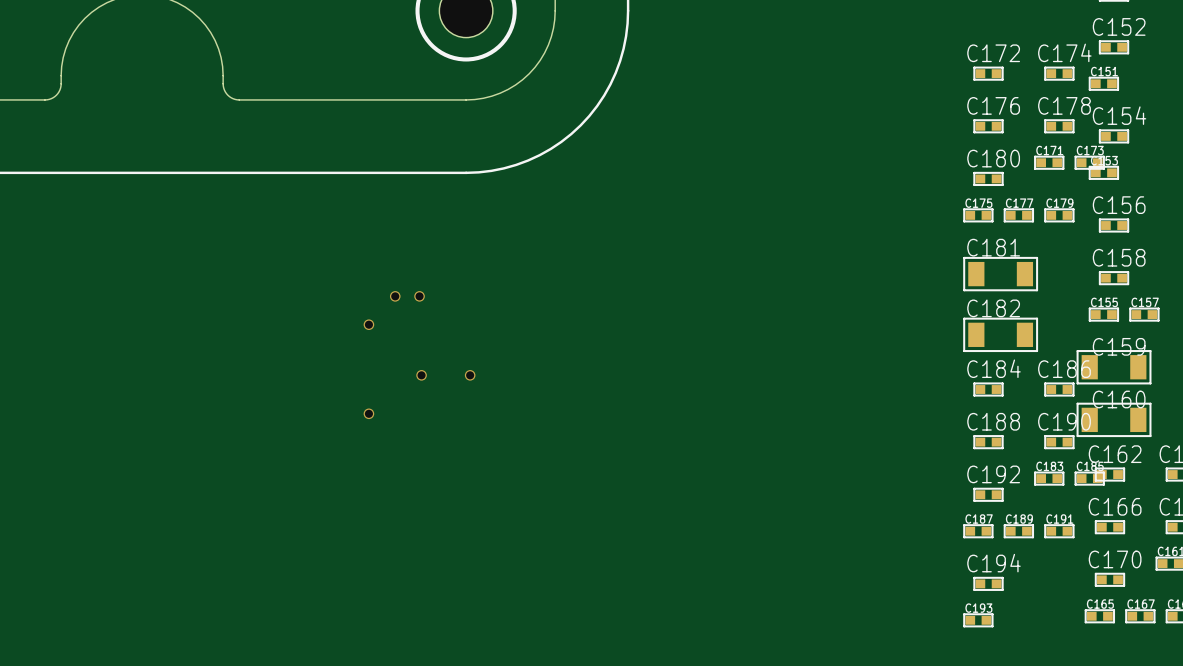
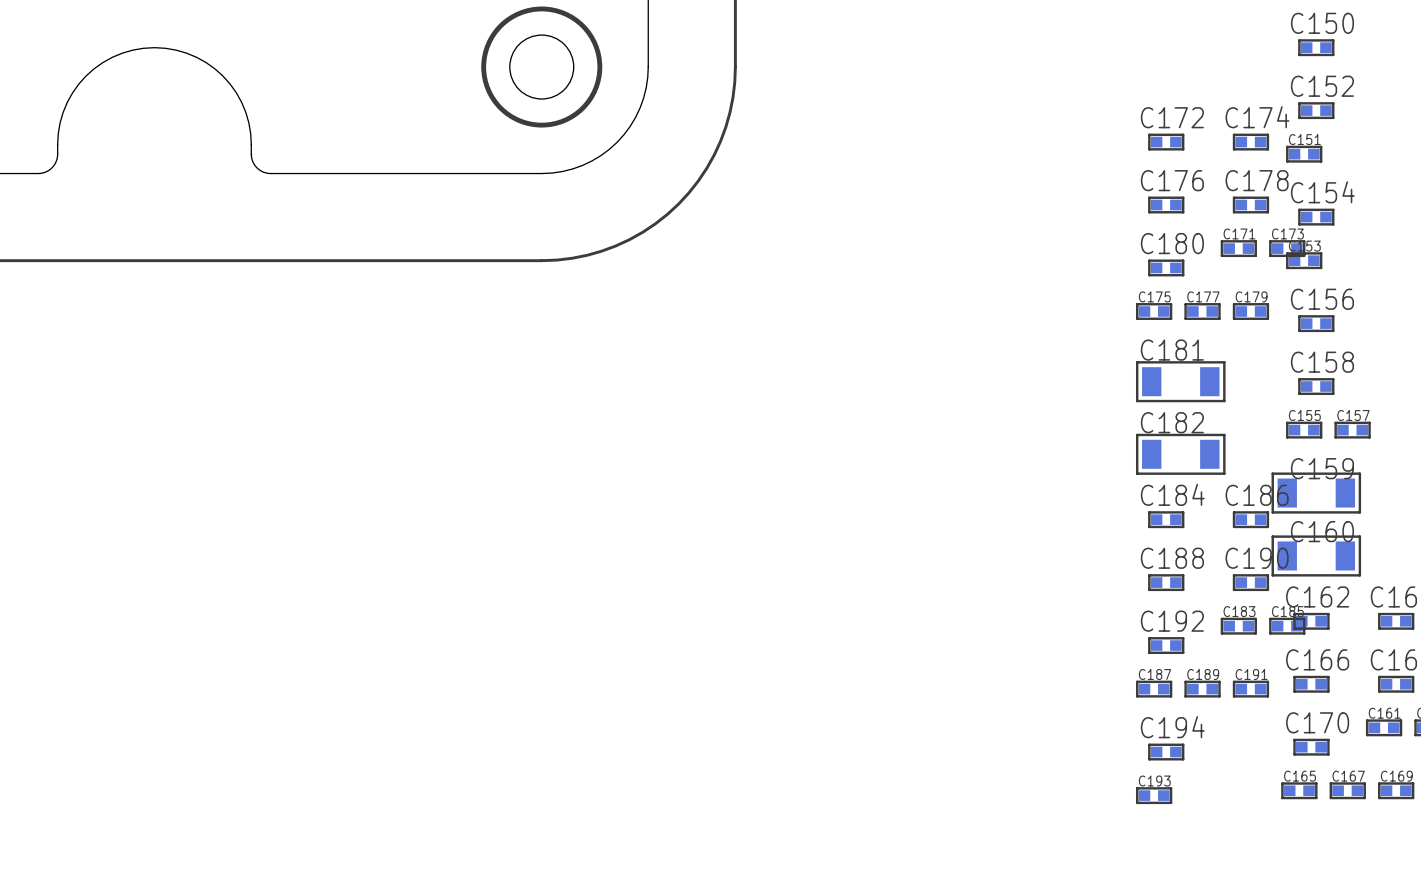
via: (395, 296) -> none
via: (419, 296) -> none
via: (368, 324) -> none
via: (421, 375) -> none
via: (470, 375) -> none
via: (368, 413) -> none

